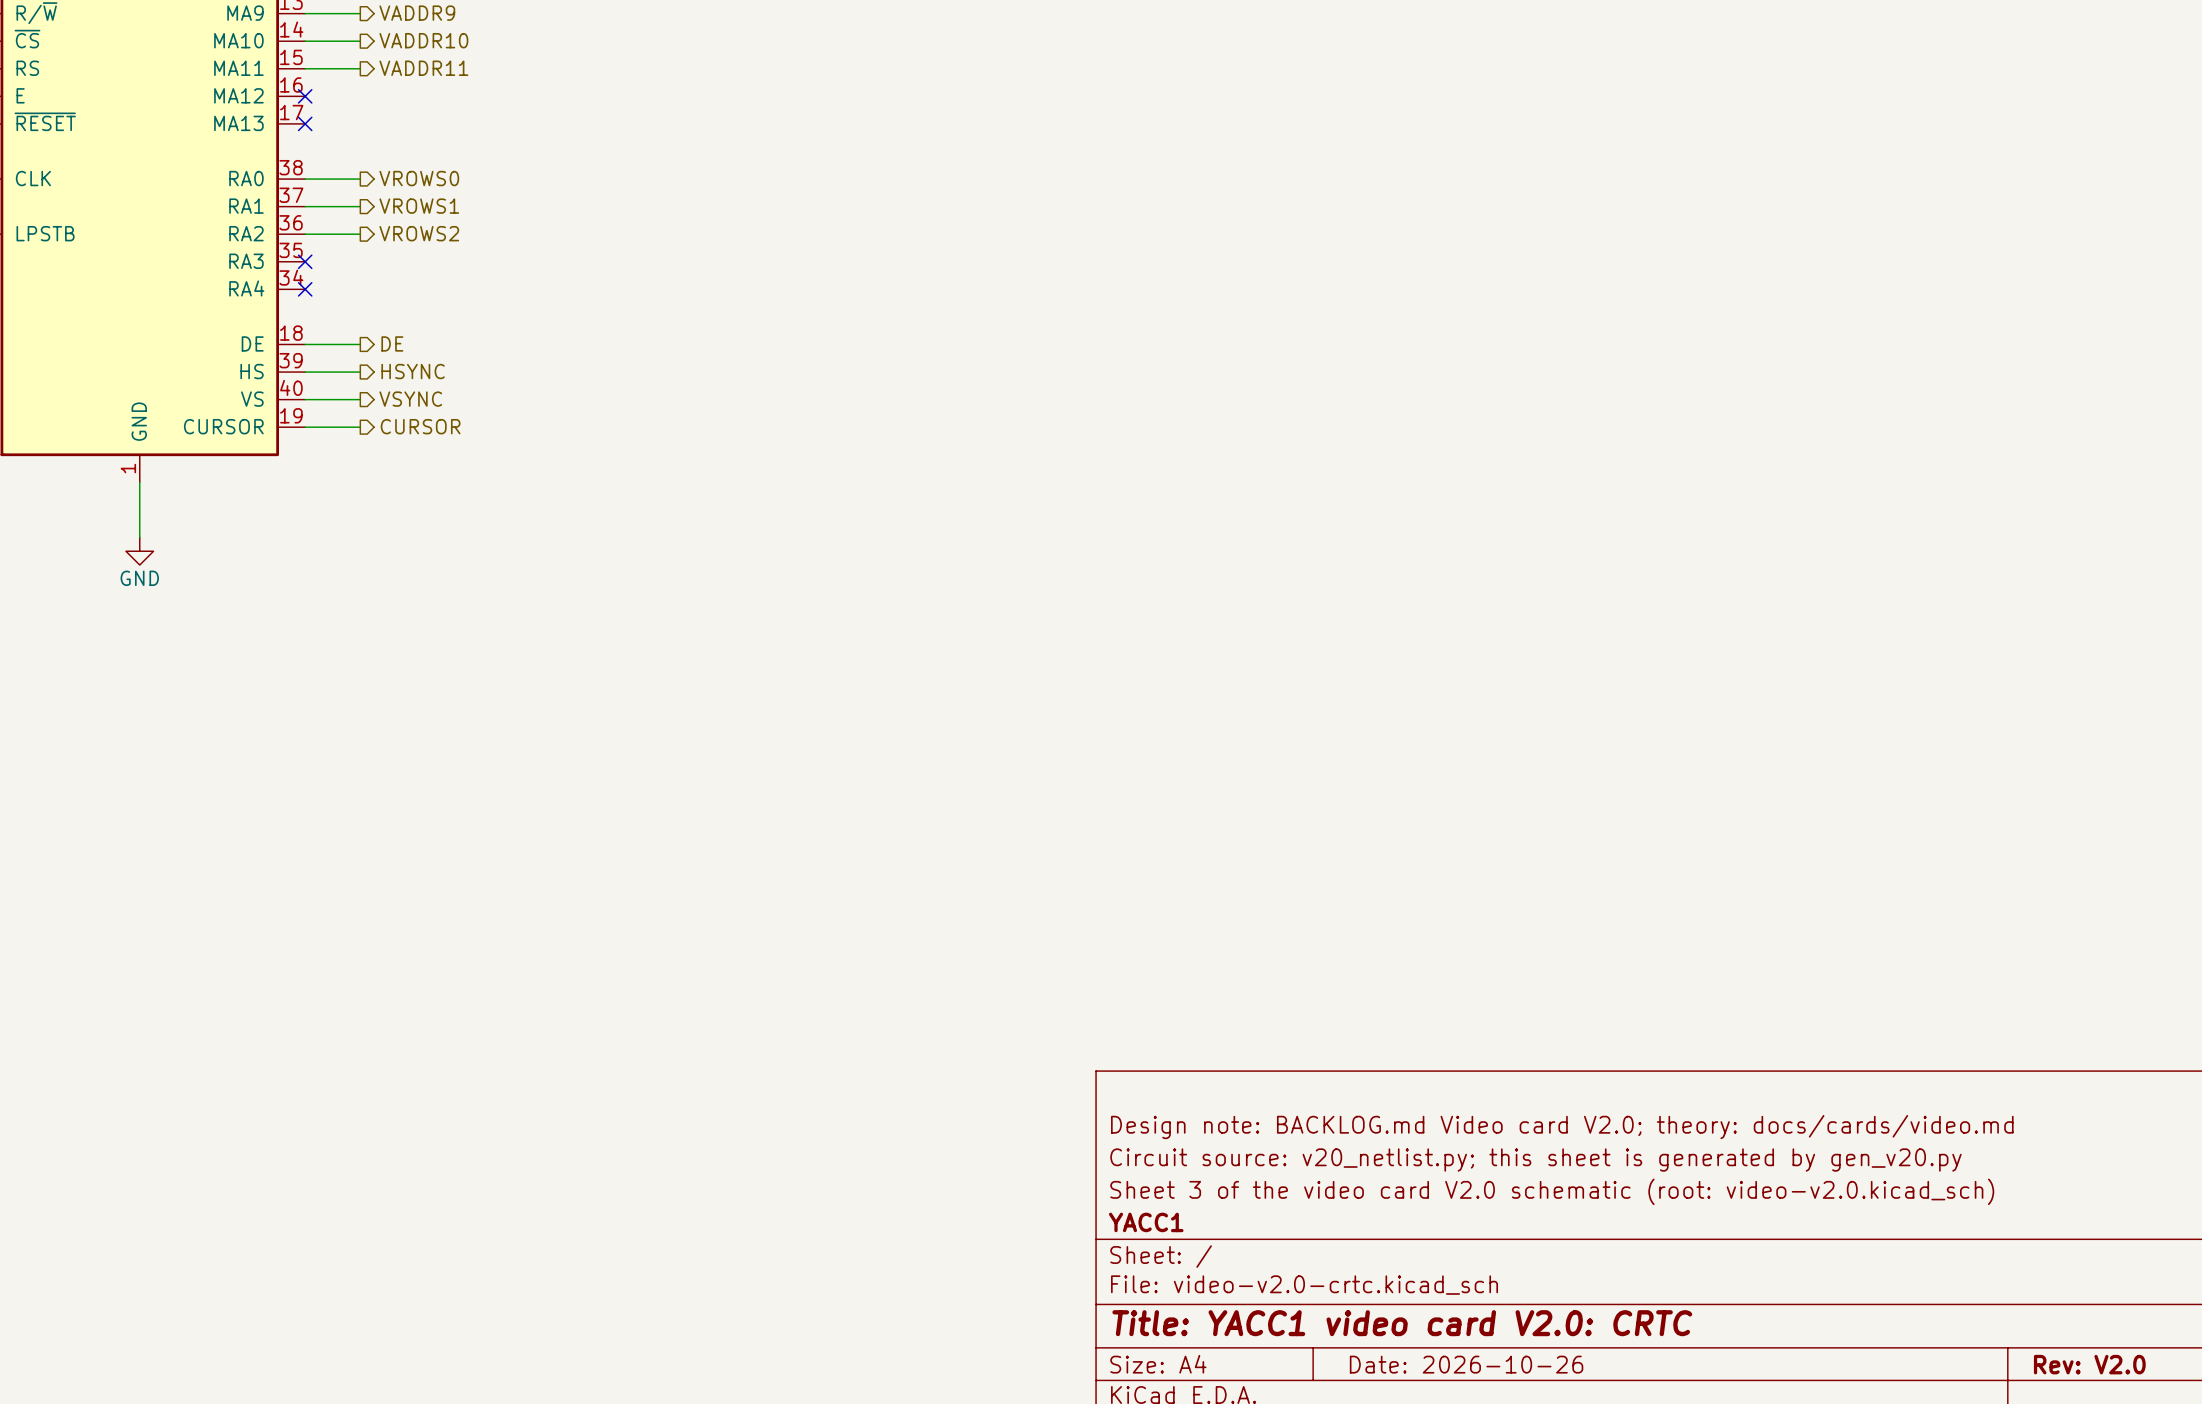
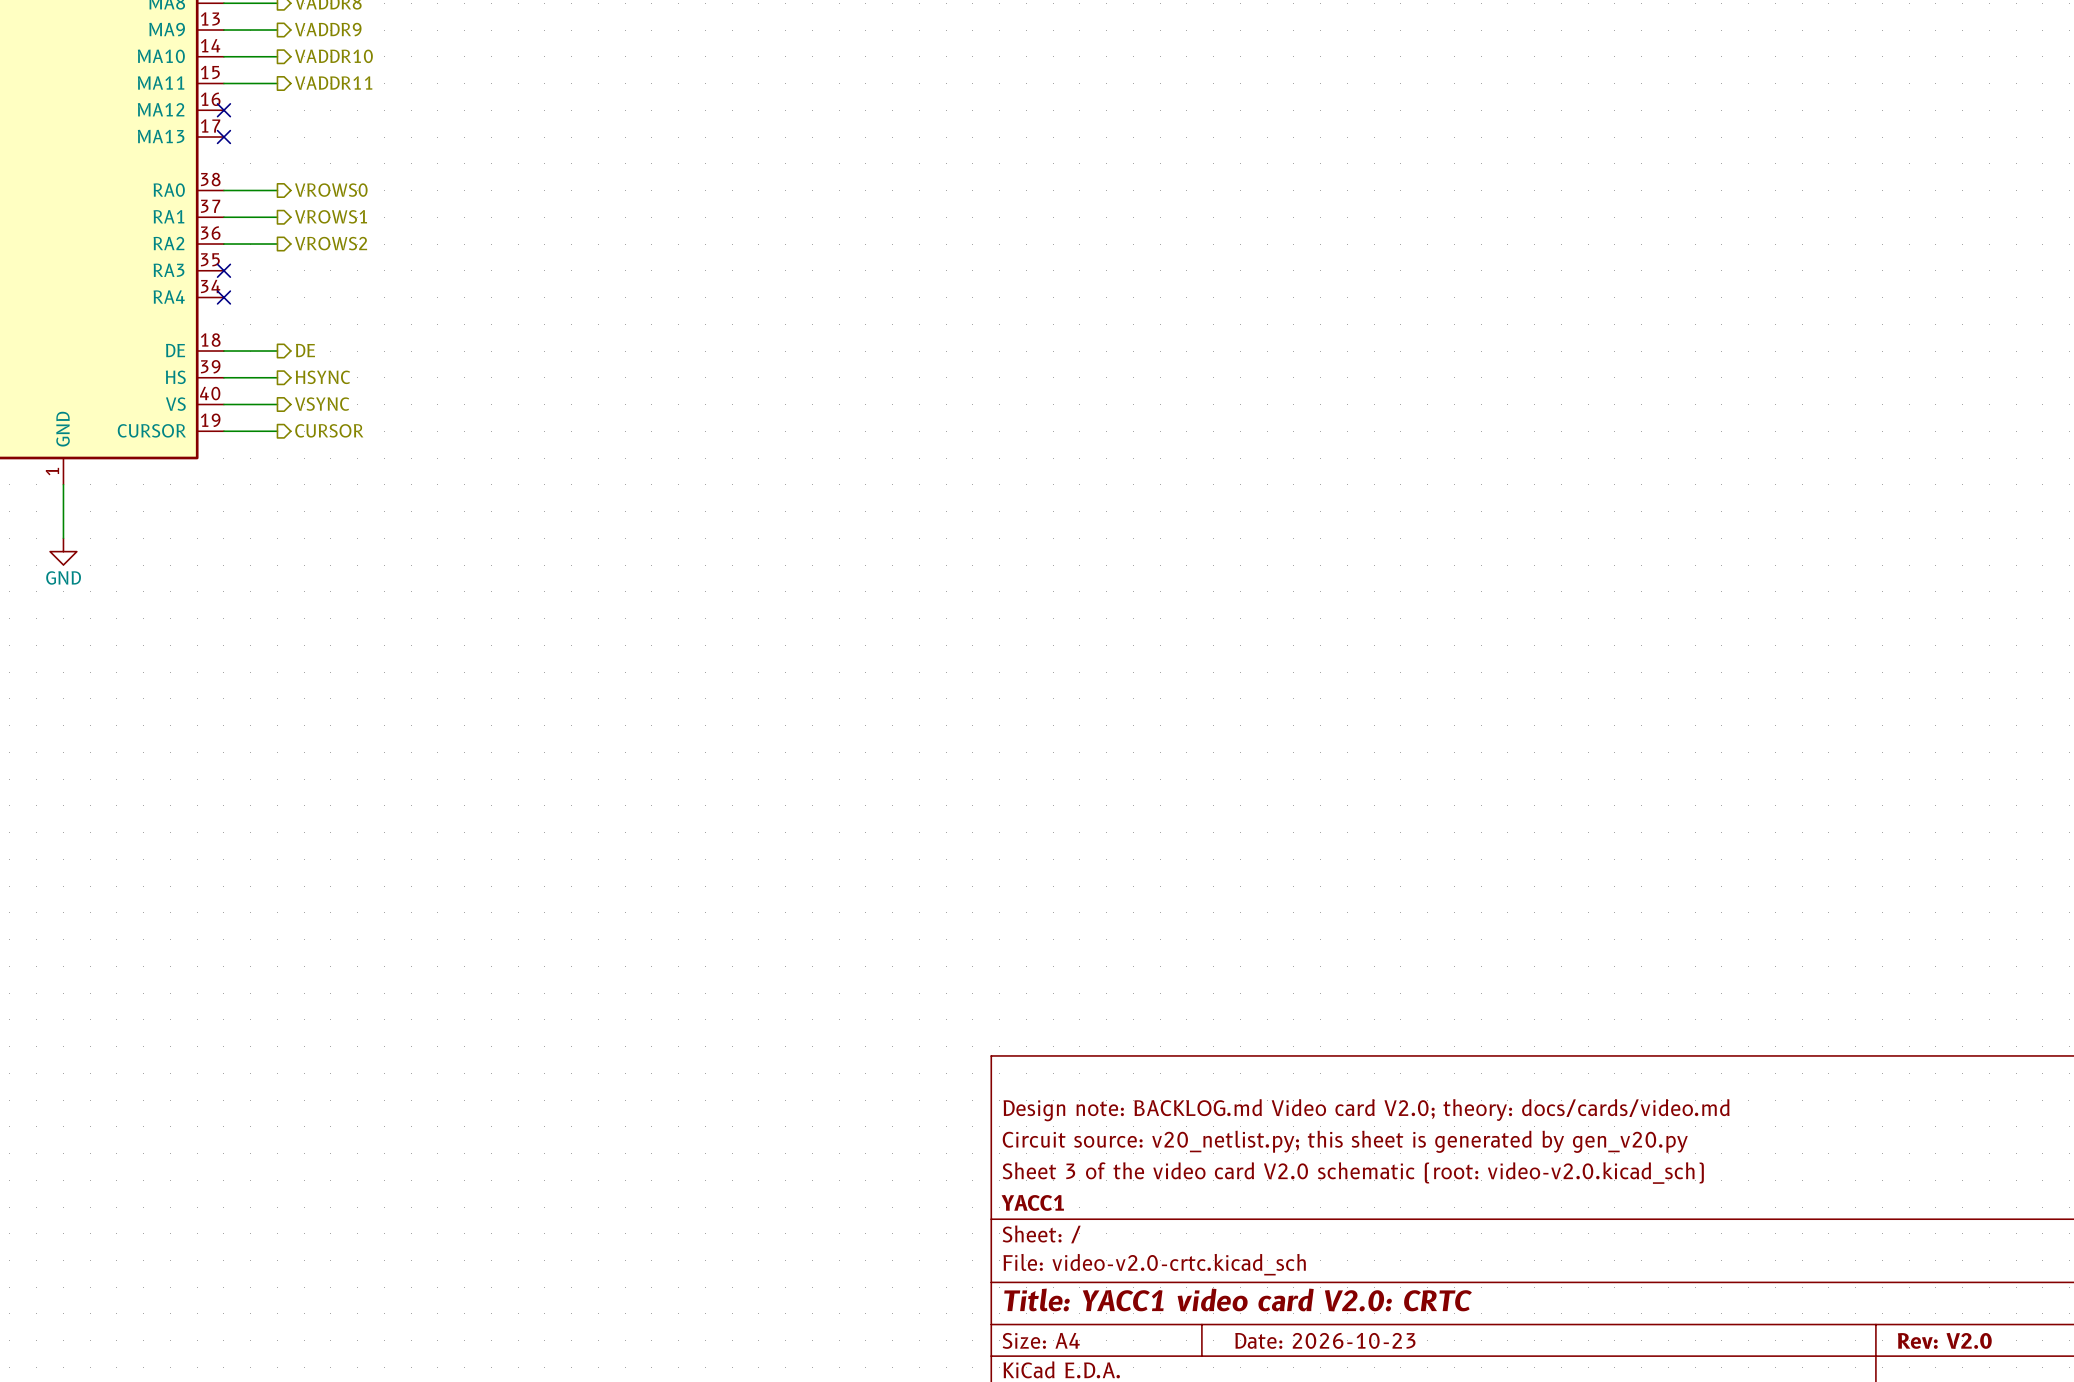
title block: Date: 2026-10-26 (1466, 1364) -> Date: 2026-10-23 (1325, 1340)

